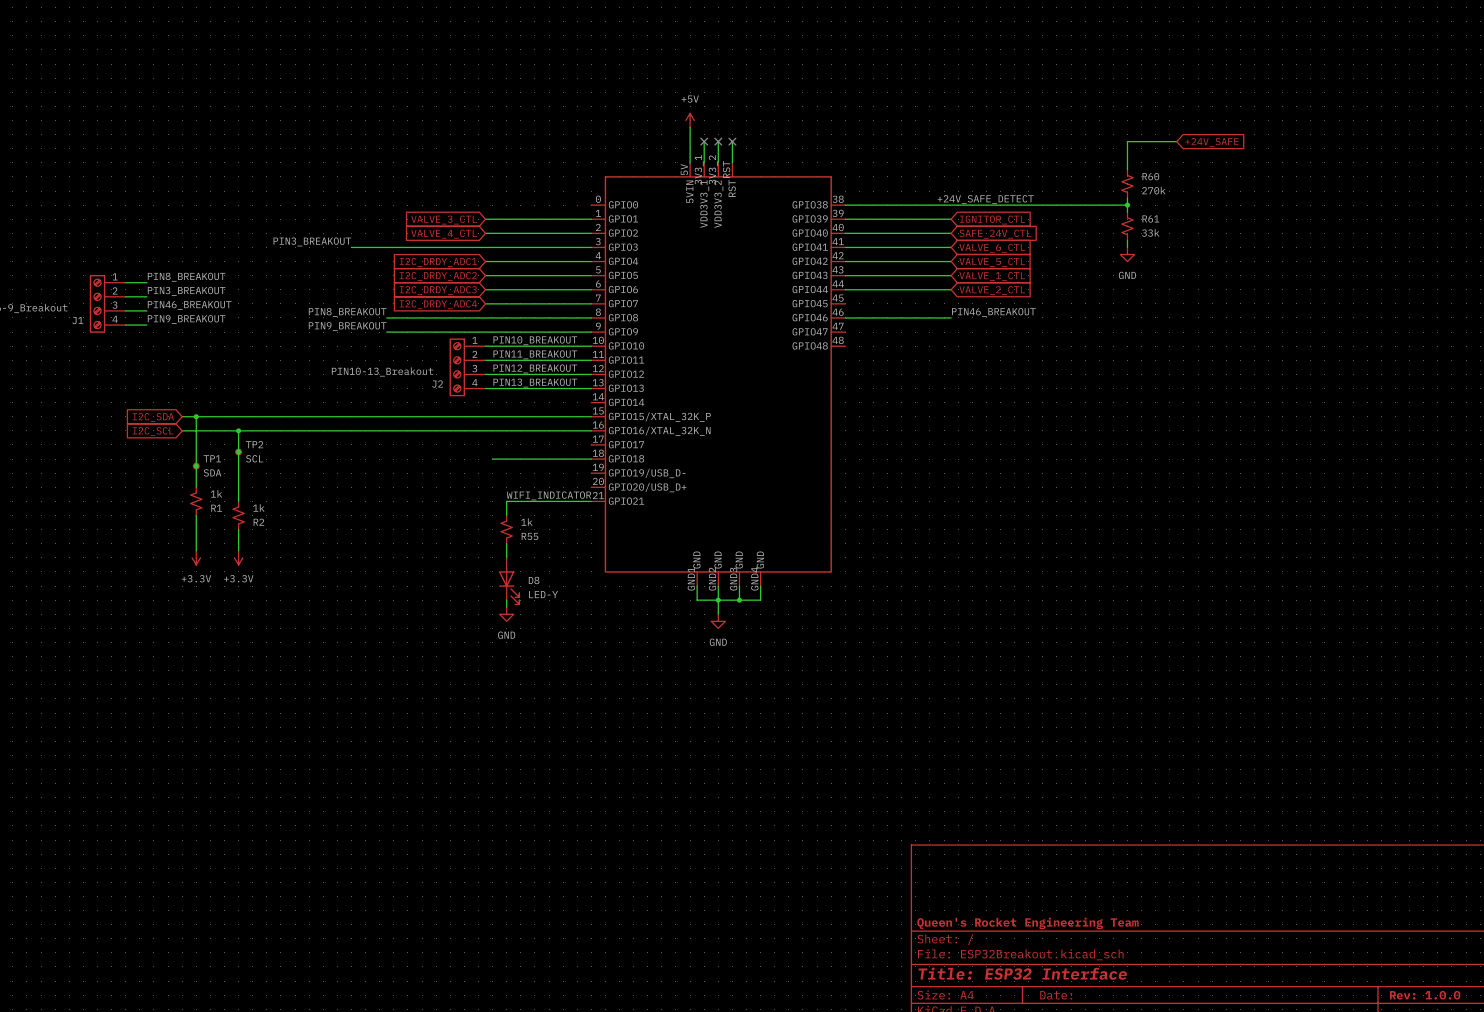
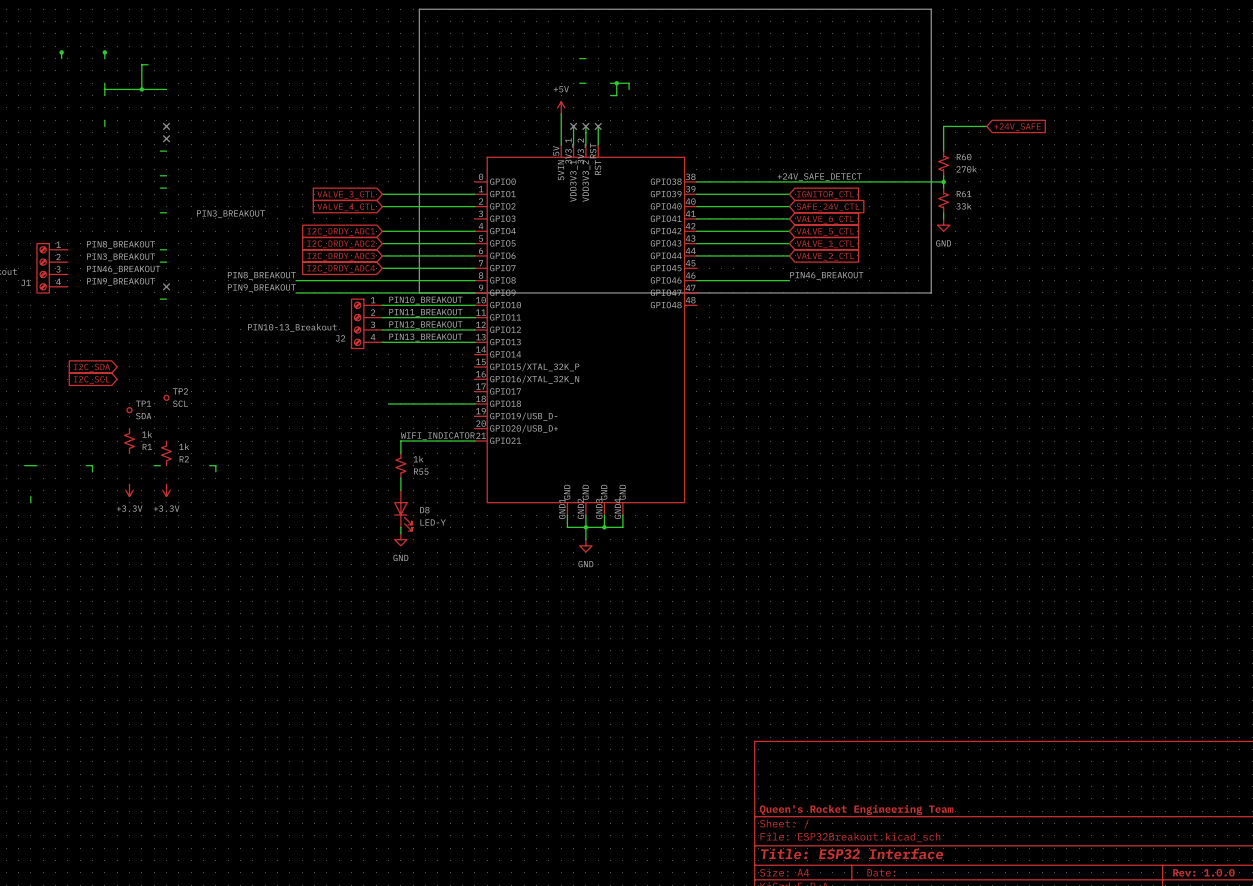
line: none -> (419, 9) (931, 9) (931, 292) (419, 292) (419, 9)
wire: none -> (61, 52) (61, 58)
junction: none -> (61, 52)
wire: none -> (104, 52) (104, 58)
junction: none -> (104, 52)
wire: none -> (579, 58) (585, 58)
wire: none -> (147, 64) (141, 64) (141, 89)
wire: none -> (104, 83) (104, 95)
wire: none -> (579, 83) (585, 83)
wire: none -> (610, 83) (629, 83) (629, 89)
wire: none -> (616, 83) (616, 95) (610, 95)
junction: none -> (616, 83)
wire: none -> (104, 89) (166, 89)
junction: none -> (141, 89)
wire: none -> (104, 120) (104, 126)
no-connect mark: none -> (166, 126)
no-connect mark: none -> (166, 138)
wire: none -> (160, 151) (166, 151)
wire: none -> (160, 175) (166, 175)
wire: none -> (160, 188) (166, 188)
wire: none -> (160, 212) (166, 212)
wire: (351, 247) (591, 247) -> none
wire: (125, 282) (146, 282) -> none
wire: none -> (160, 249) (166, 249)
wire: (125, 296) (146, 296) -> none
wire: none -> (160, 262) (166, 262)
wire: (125, 310) (146, 310) -> none
wire: (125, 325) (146, 325) -> none
no-connect mark: none -> (166, 286)
wire: none -> (160, 299) (166, 299)
wire: (182, 416) (591, 416) -> none
wire: (196, 416) (196, 487) -> none
junction: (196, 416) -> none
wire: (182, 430) (591, 430) -> none
wire: (238, 430) (238, 501) -> none
junction: (238, 430) -> none
junction: (238, 452) -> none
junction: (196, 466) -> none
wire: (196, 515) (196, 550) -> none
wire: none -> (24, 465) (36, 465)
wire: none -> (86, 465) (92, 465) (92, 471)
wire: none -> (154, 465) (160, 465)
wire: (238, 529) (238, 550) -> none
wire: none -> (209, 465) (215, 465) (215, 471)
wire: none -> (30, 496) (30, 502)

